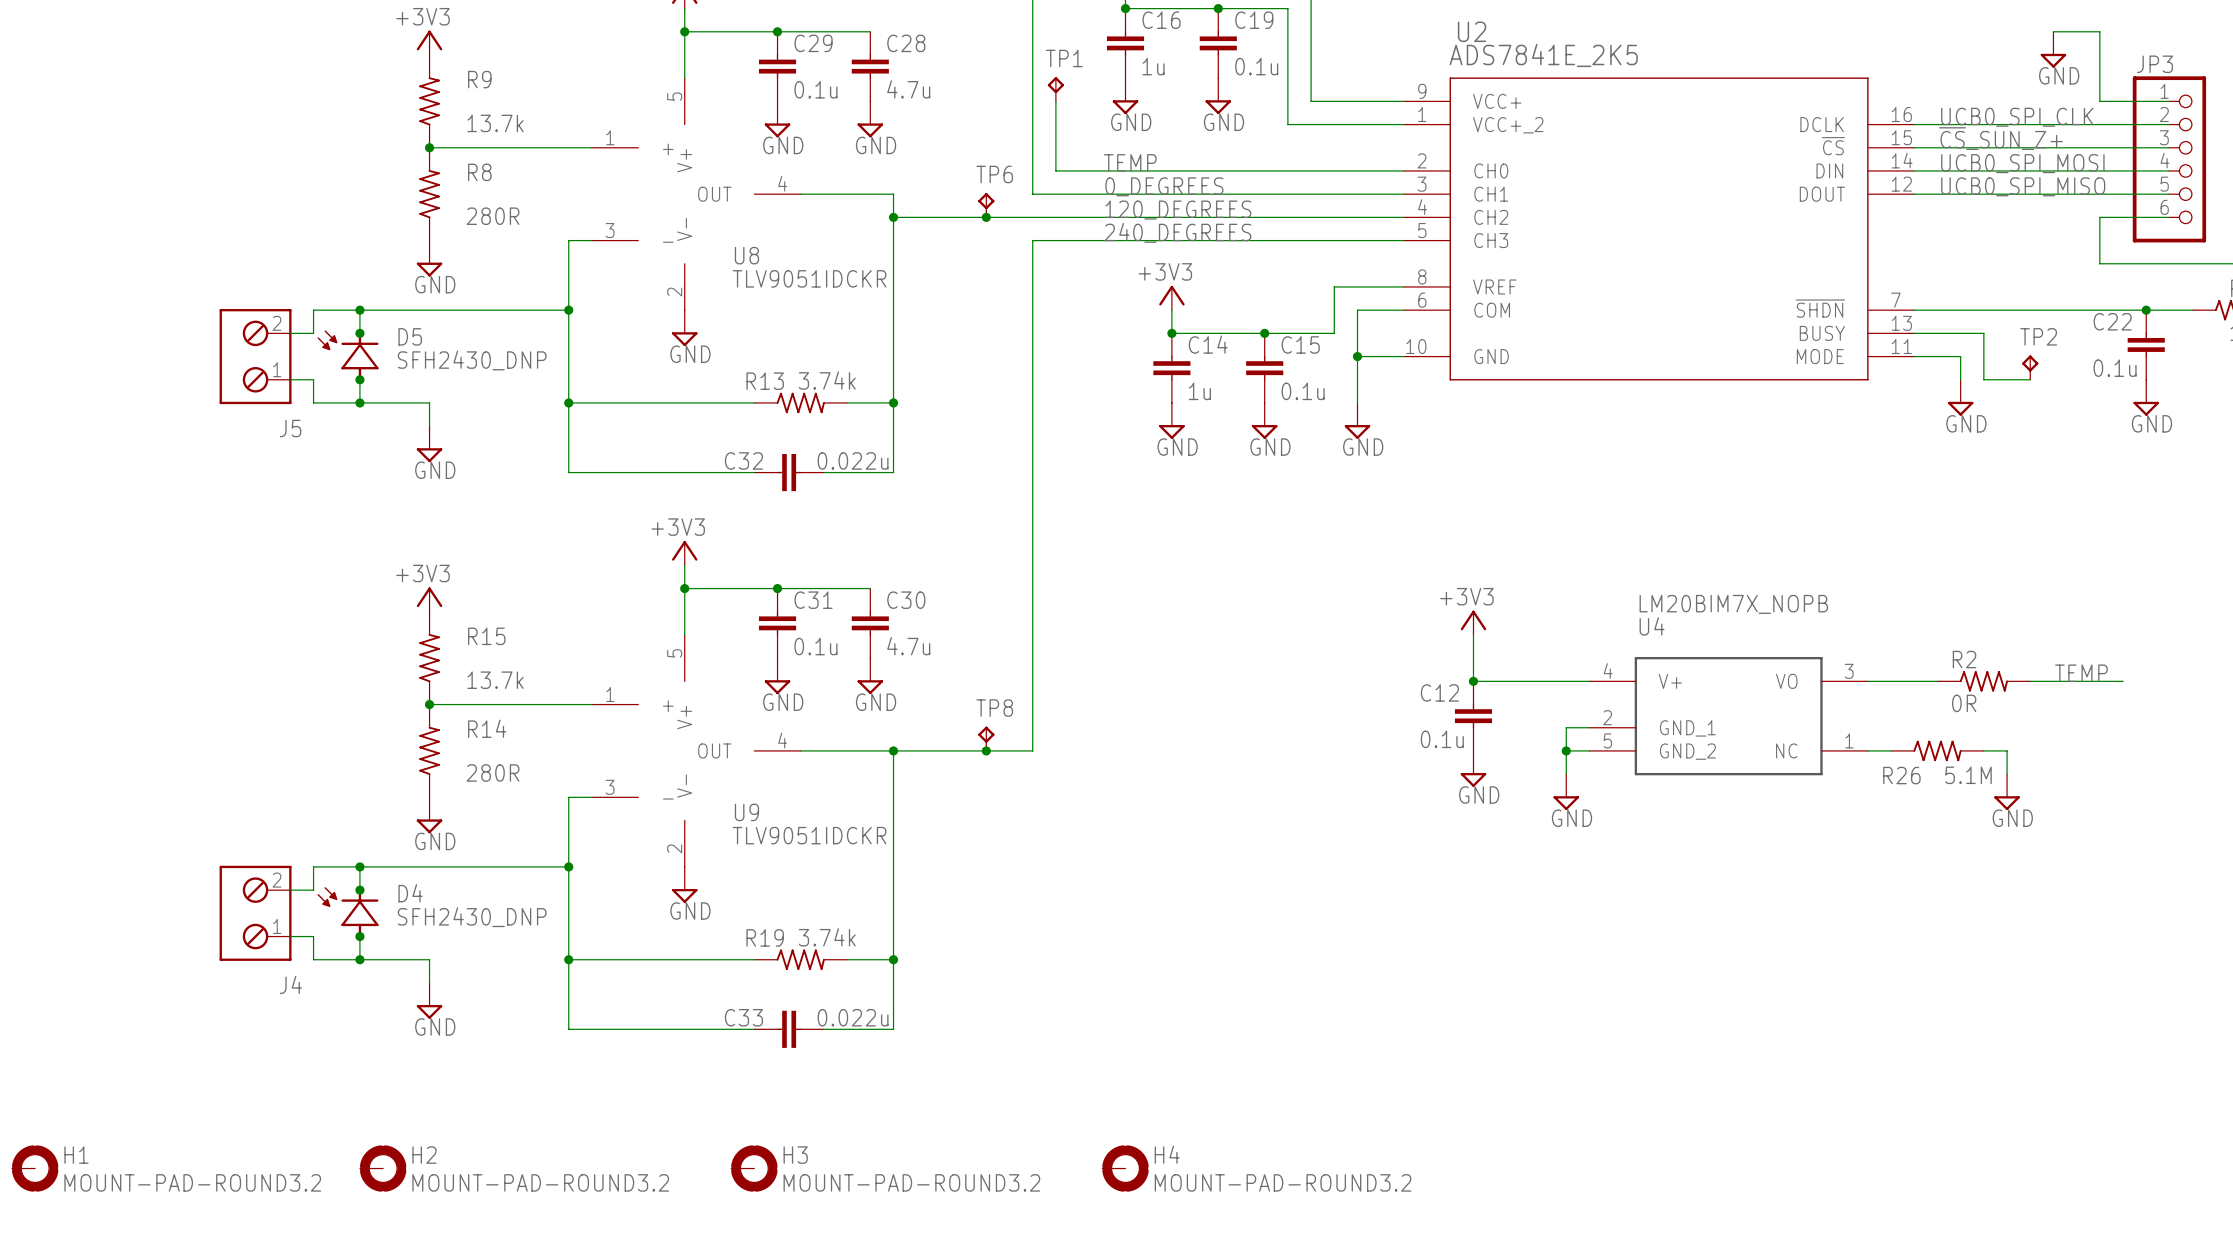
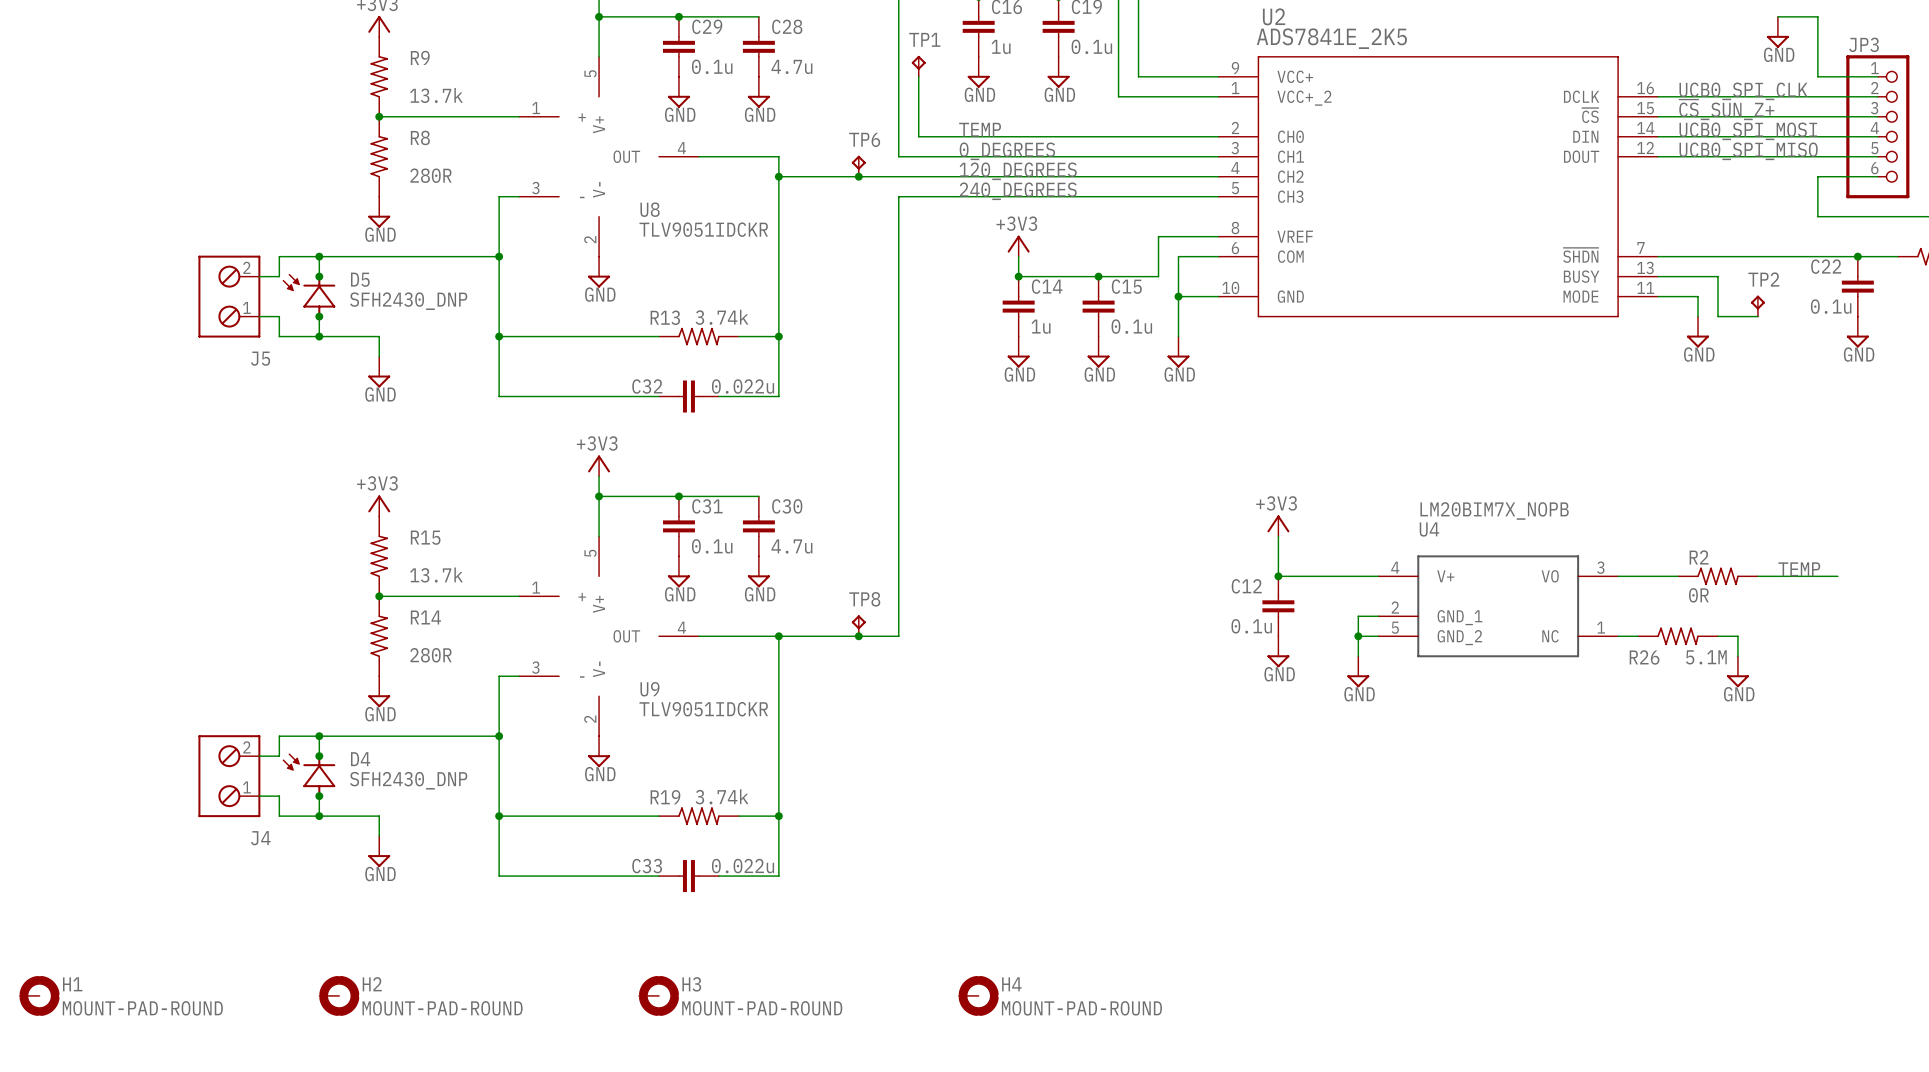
H1 value: MOUNT-PAD-ROUND3.2 (192, 1182) -> MOUNT-PAD-ROUND (142, 1008)
H2 value: MOUNT-PAD-ROUND3.2 (540, 1182) -> MOUNT-PAD-ROUND (442, 1008)
H3 value: MOUNT-PAD-ROUND3.2 (911, 1182) -> MOUNT-PAD-ROUND (762, 1008)
H4 value: MOUNT-PAD-ROUND3.2 (1283, 1182) -> MOUNT-PAD-ROUND (1081, 1008)

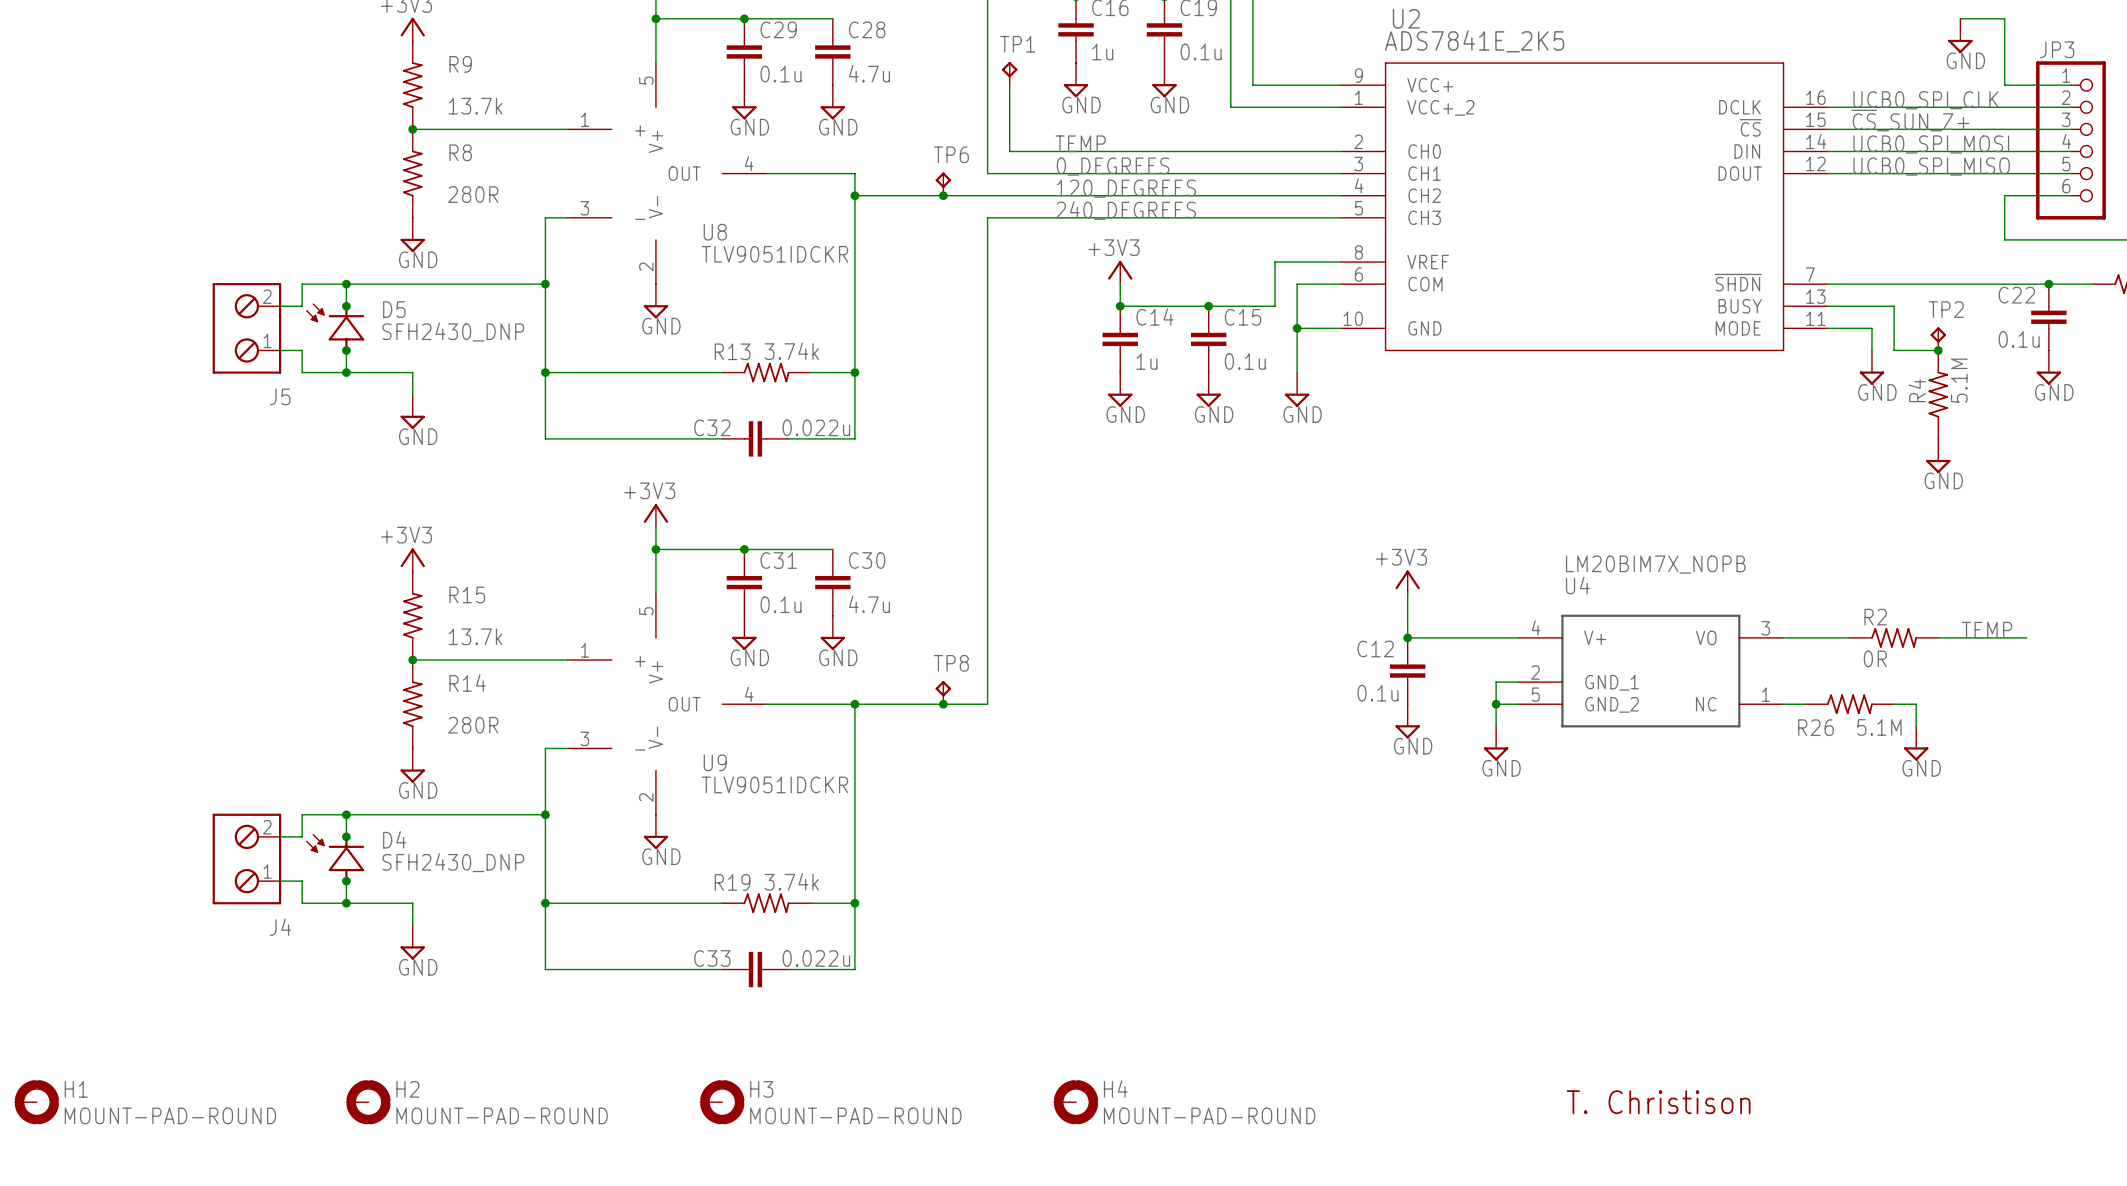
junction: none -> (1938, 350)
R4: none -> 5.1M (1938, 394)
power symbol: none -> GND (1938, 456)
text: none -> T. Christison (1658, 1102)

